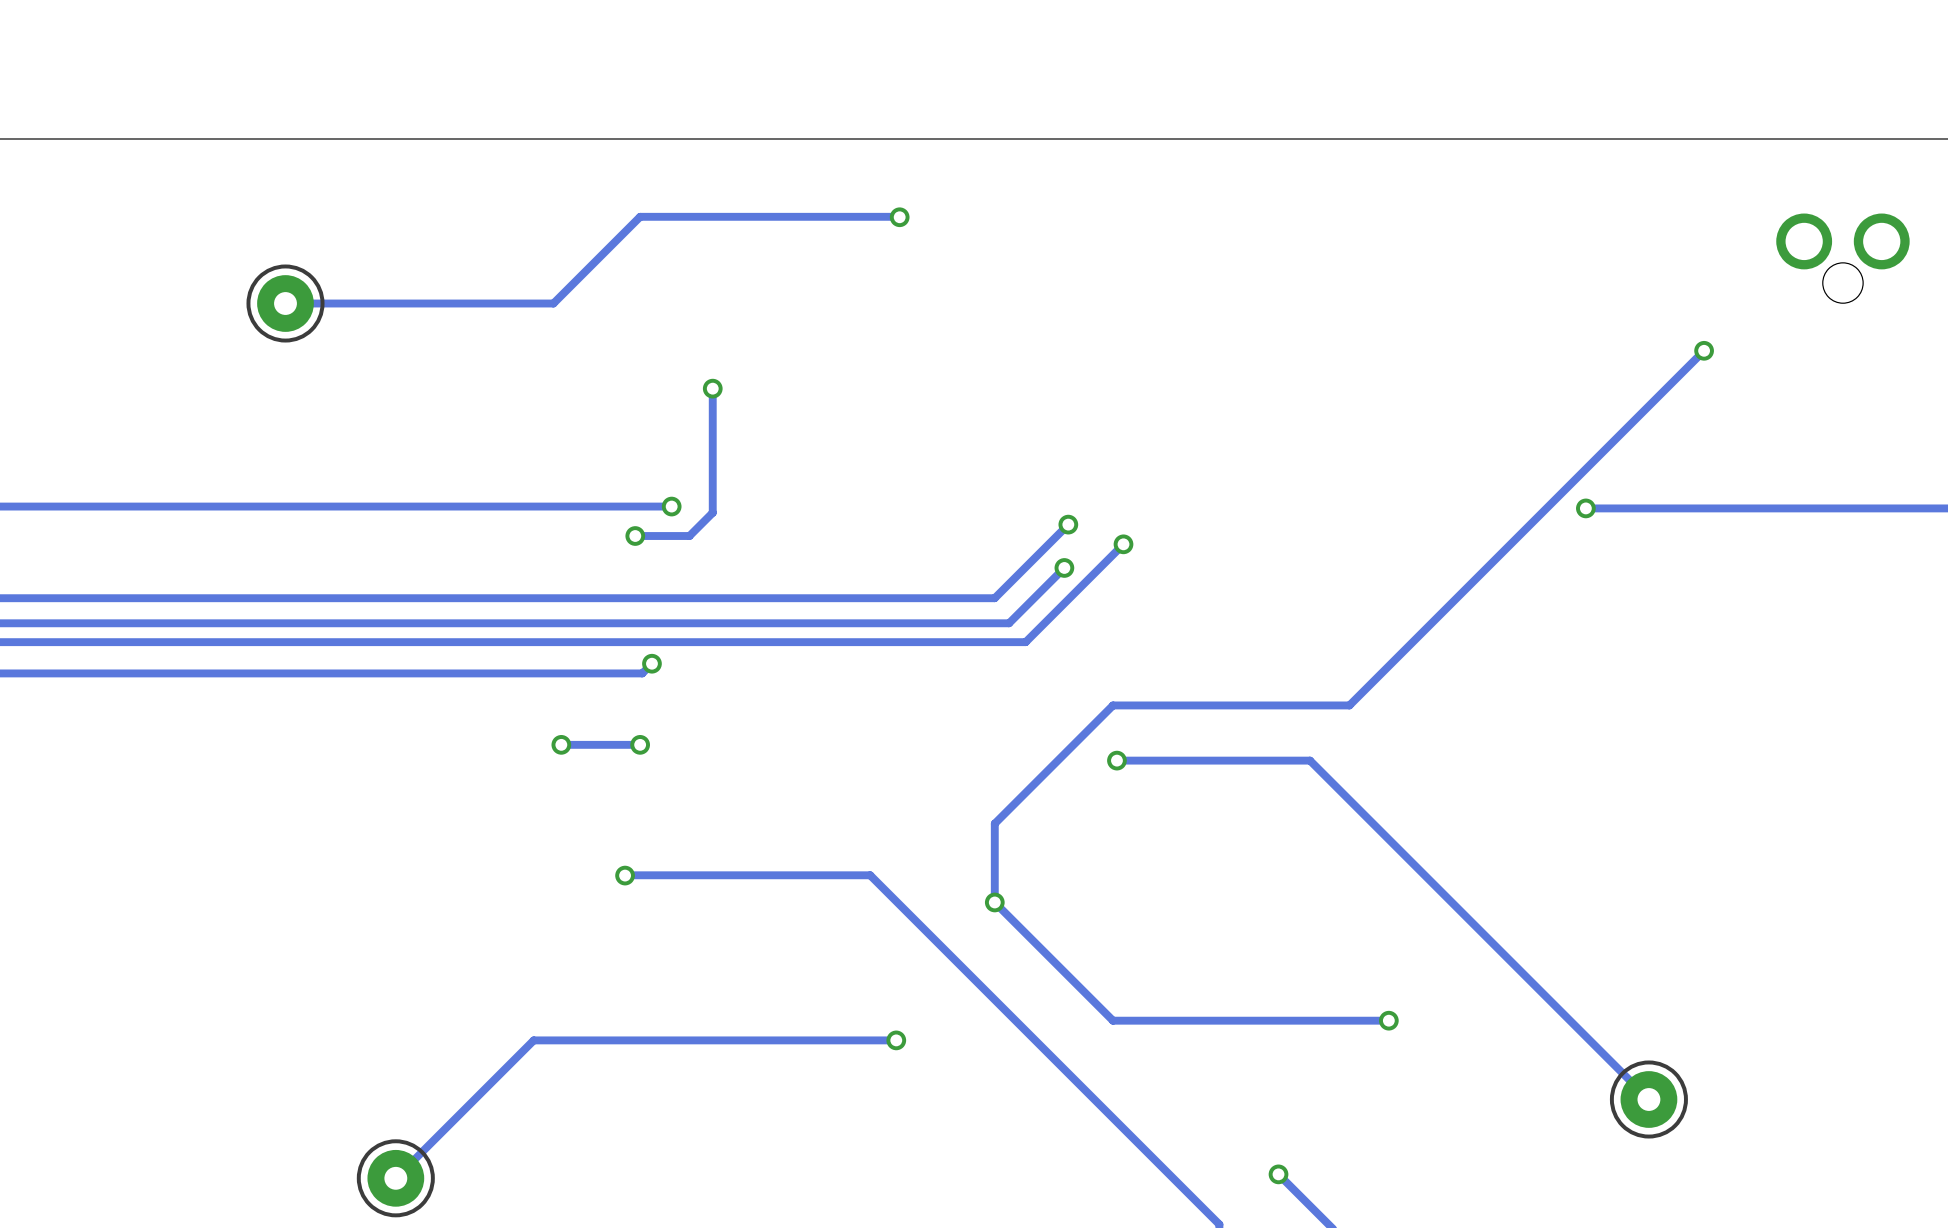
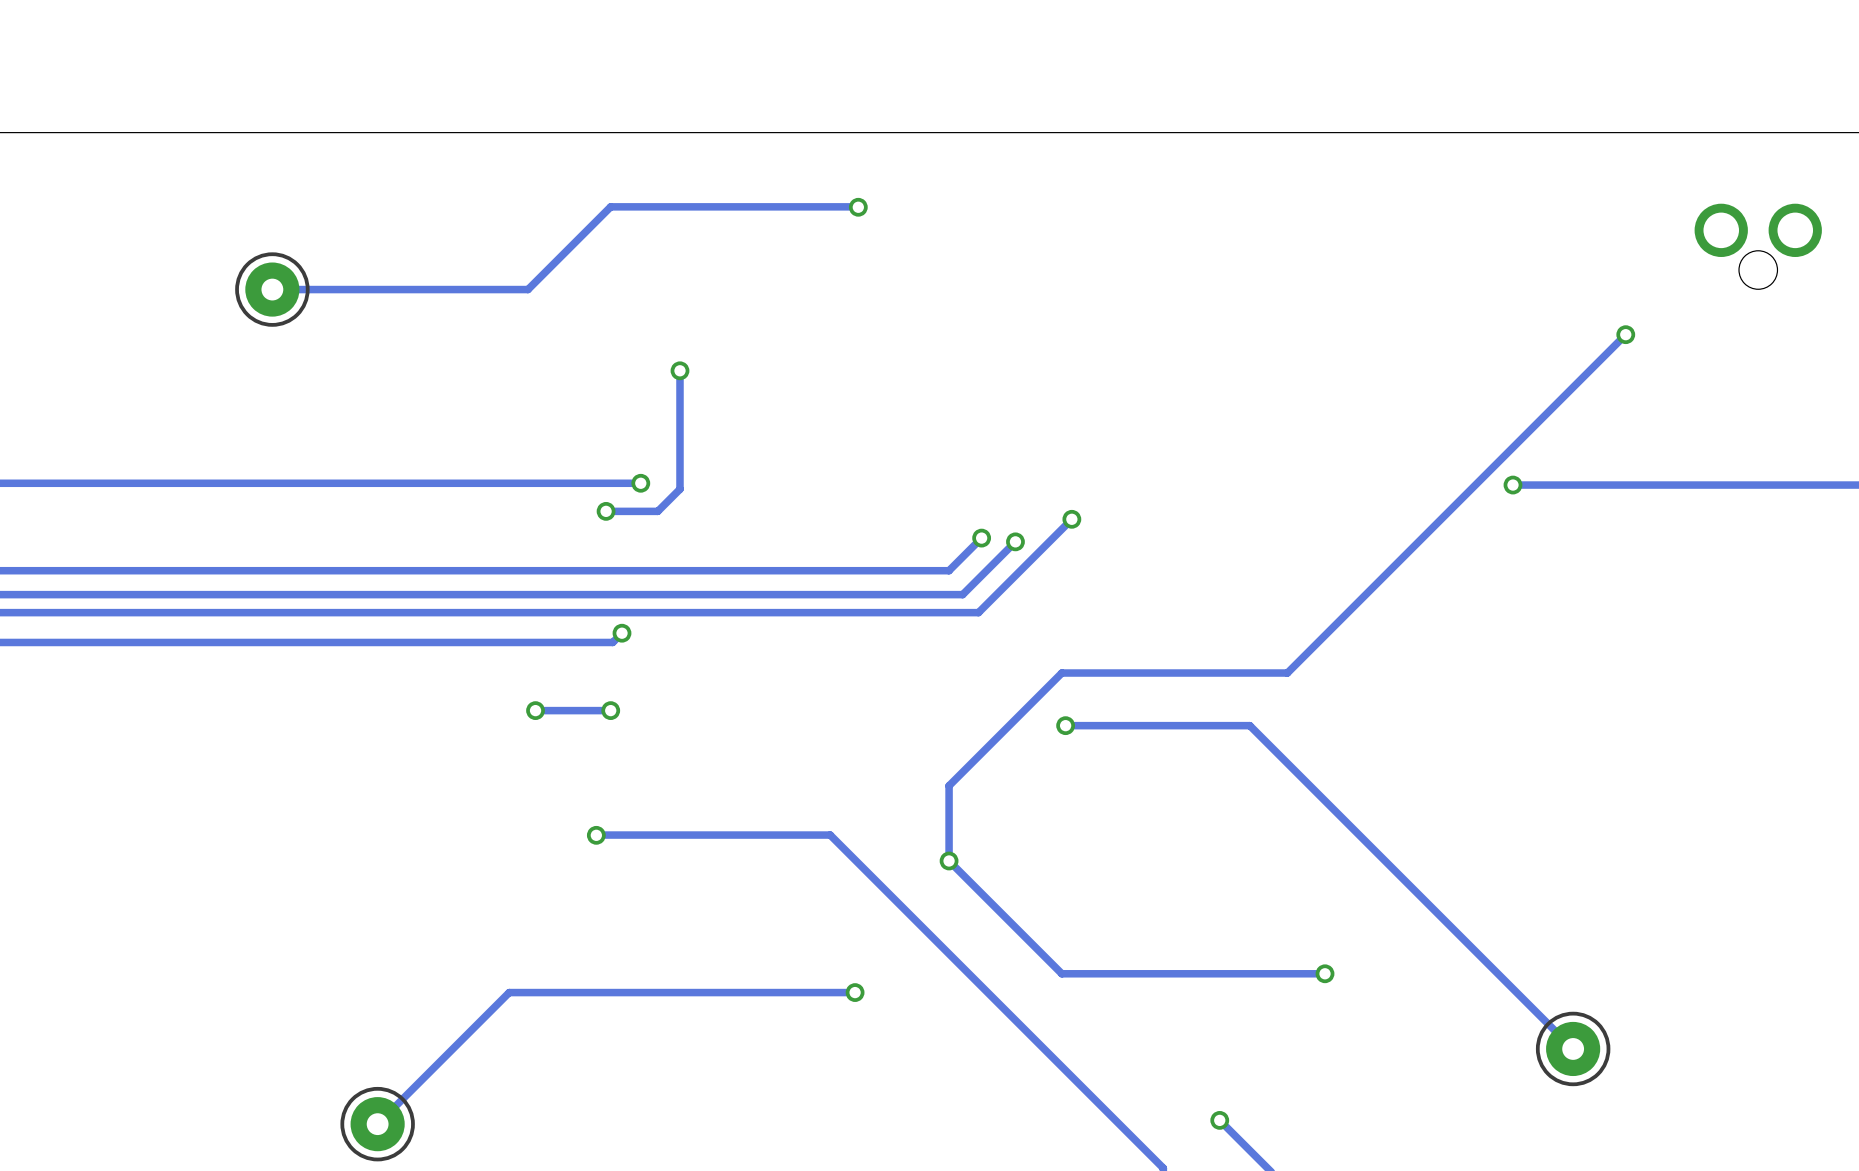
track: (1068, 524) (1028, 564) -> none
via position: (1068, 524) -> (981, 538)

